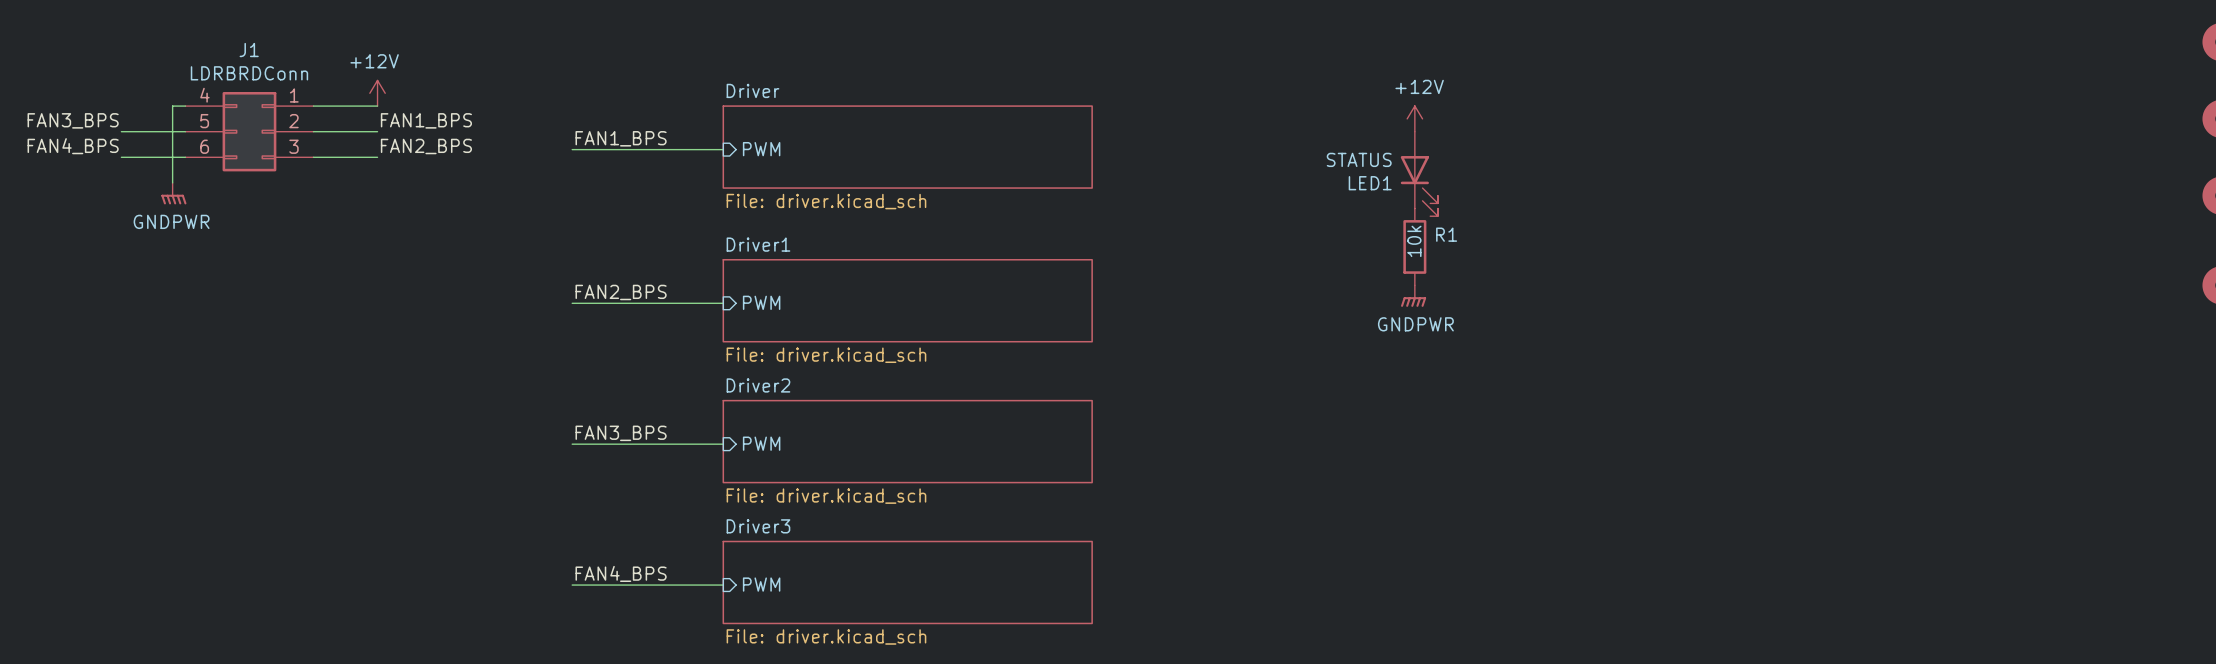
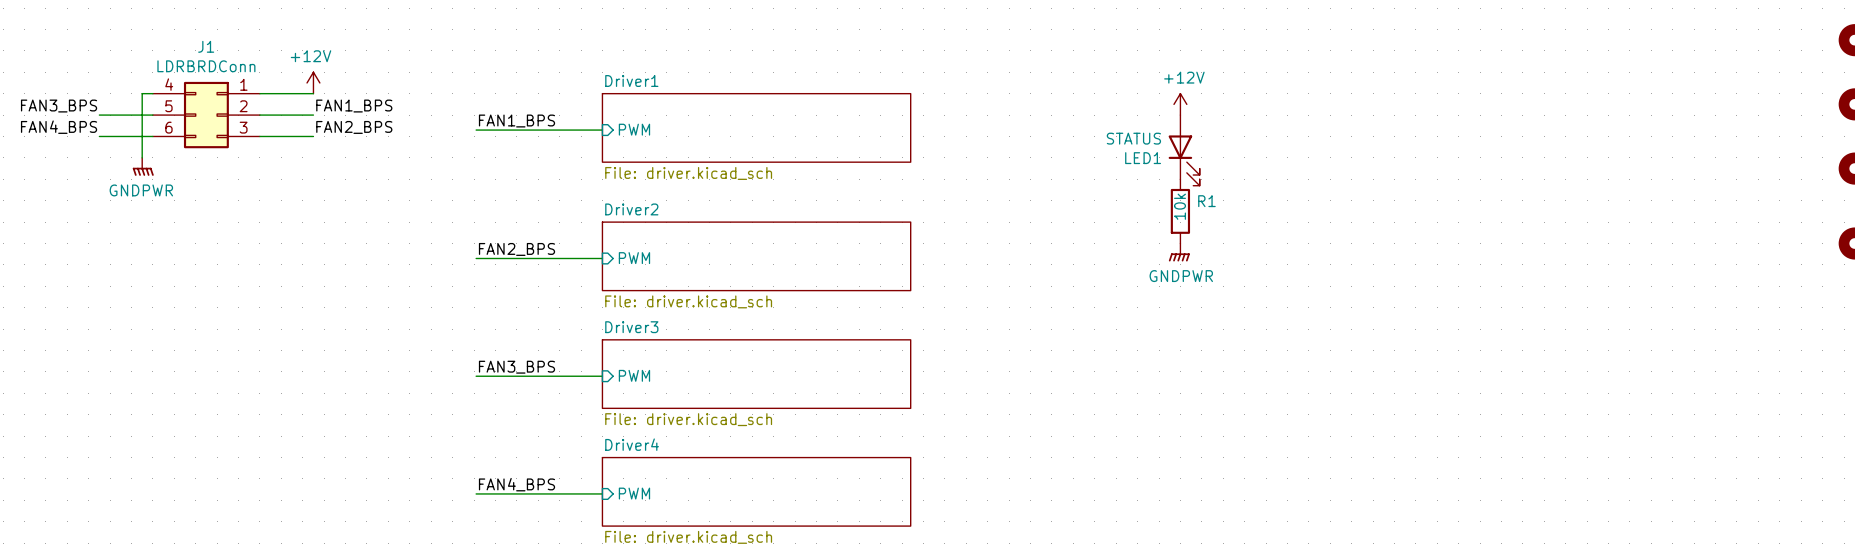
sheet Driver name: Driver (752, 90) -> Driver1 (631, 81)
sheet Driver1 name: Driver1 (758, 244) -> Driver2 (631, 209)
sheet Driver2 name: Driver2 (758, 385) -> Driver3 (631, 327)
sheet Driver3 name: Driver3 (758, 526) -> Driver4 (632, 444)

